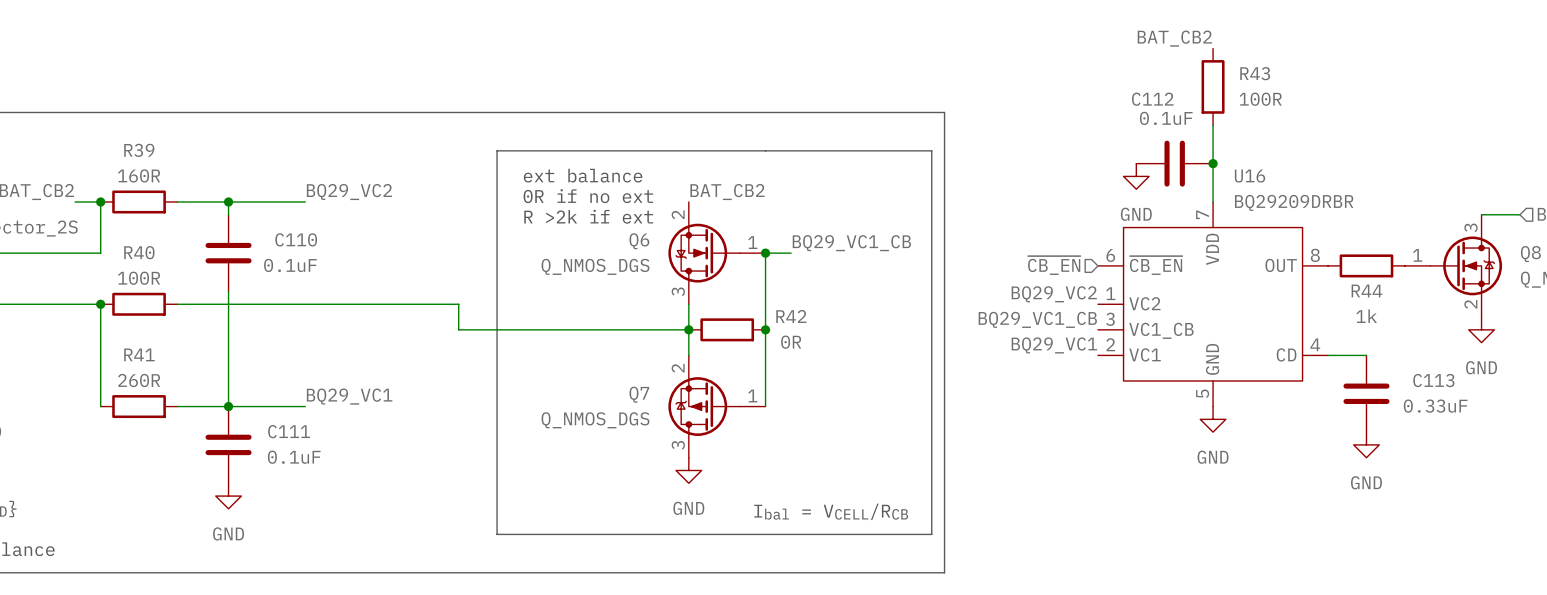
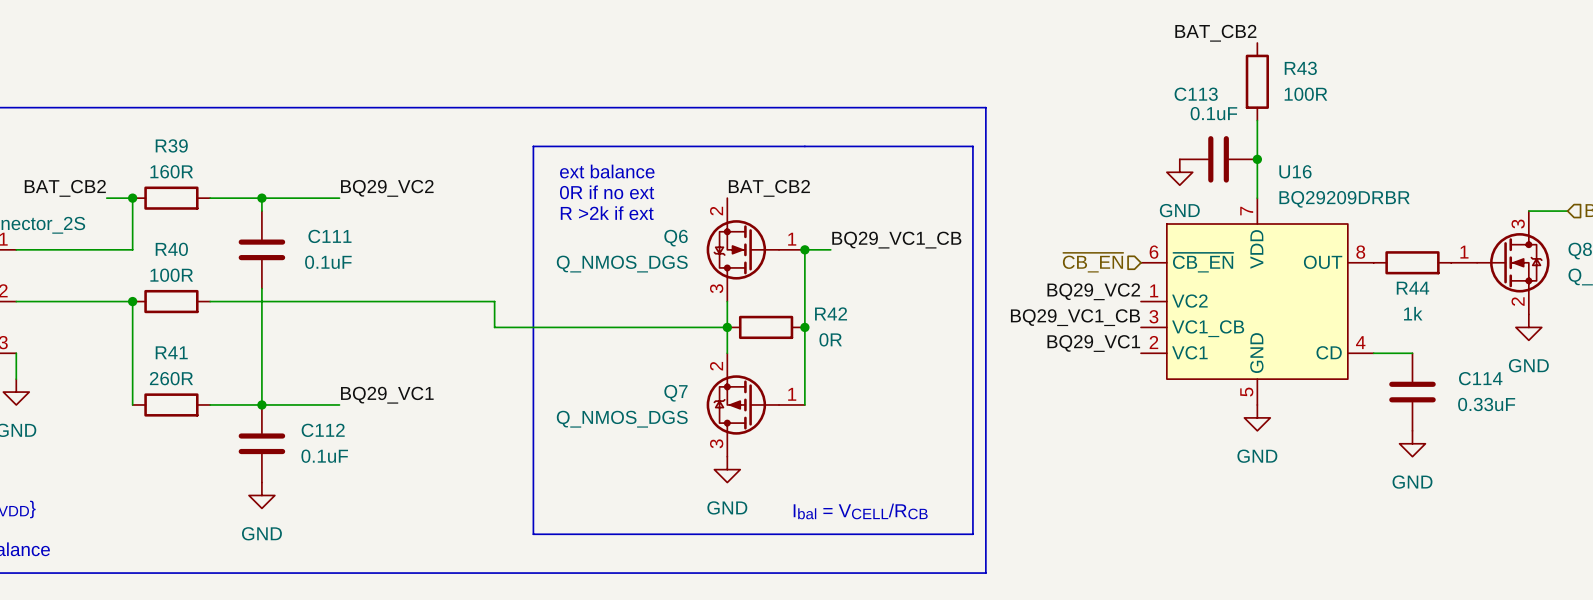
C112 name: C112 (1152, 99) -> C113 (1196, 94)
C110 name: C110 (296, 239) -> C111 (329, 236)
C113 name: C113 (1433, 380) -> C114 (1480, 378)
C111 name: C111 (289, 431) -> C112 (323, 430)

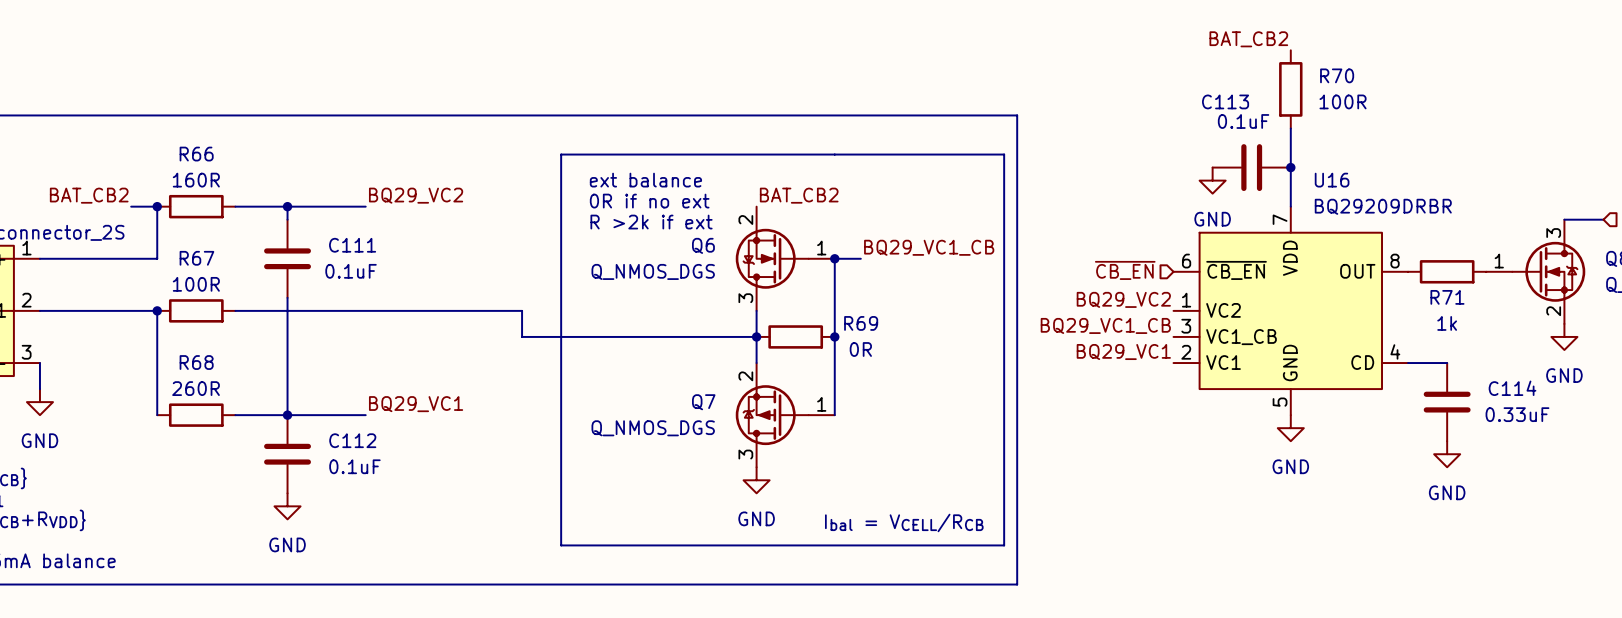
R43 name: R43 (1300, 68) -> R70 (1337, 75)
R39 name: R39 (171, 145) -> R66 (196, 154)
R40 name: R40 (171, 249) -> R67 (196, 258)
R44 name: R44 (1412, 288) -> R71 (1447, 297)
R42 name: R42 (831, 313) -> R69 (861, 323)
R41 name: R41 (171, 352) -> R68 (196, 362)

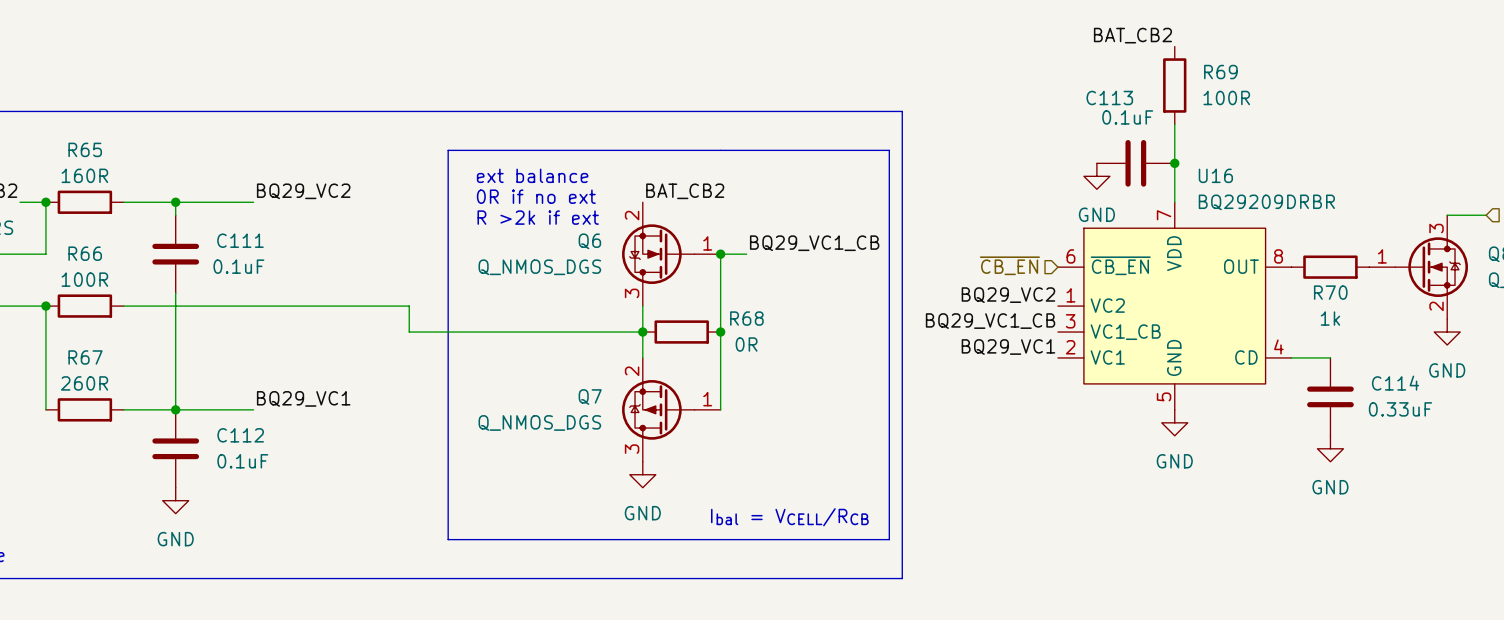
R70 name: R70 (1337, 75) -> R69 (1220, 72)
R66 name: R66 (196, 154) -> R65 (85, 149)
R67 name: R67 (196, 258) -> R66 (85, 253)
R71 name: R71 (1447, 297) -> R70 (1330, 292)
R69 name: R69 (861, 323) -> R68 (746, 318)
R68 name: R68 (196, 362) -> R67 (85, 357)

